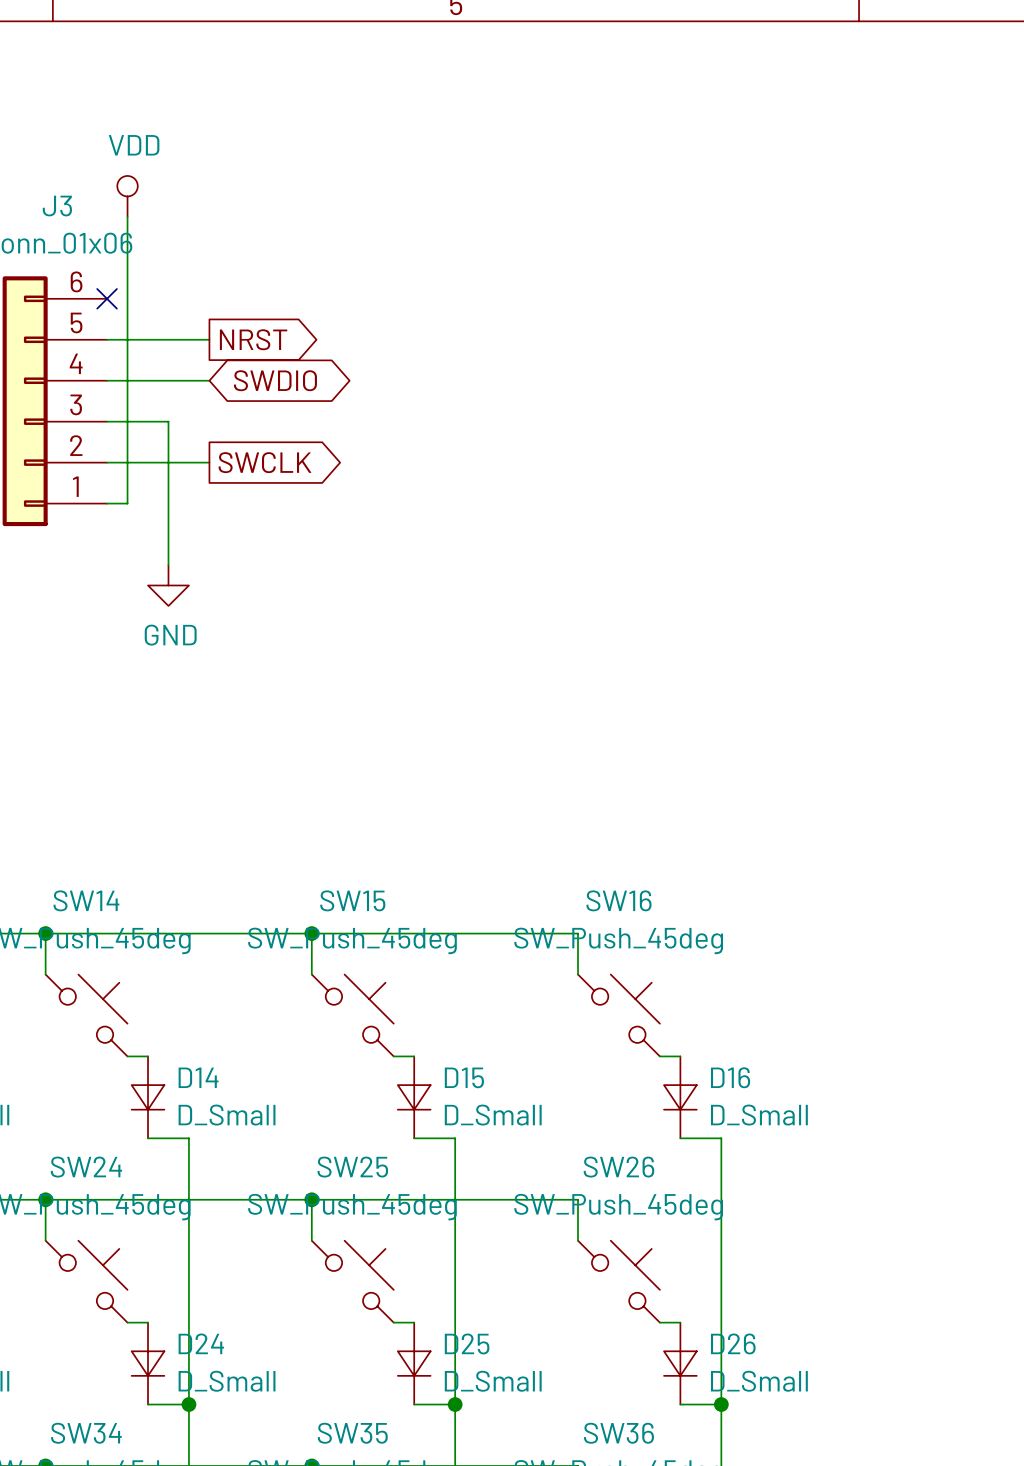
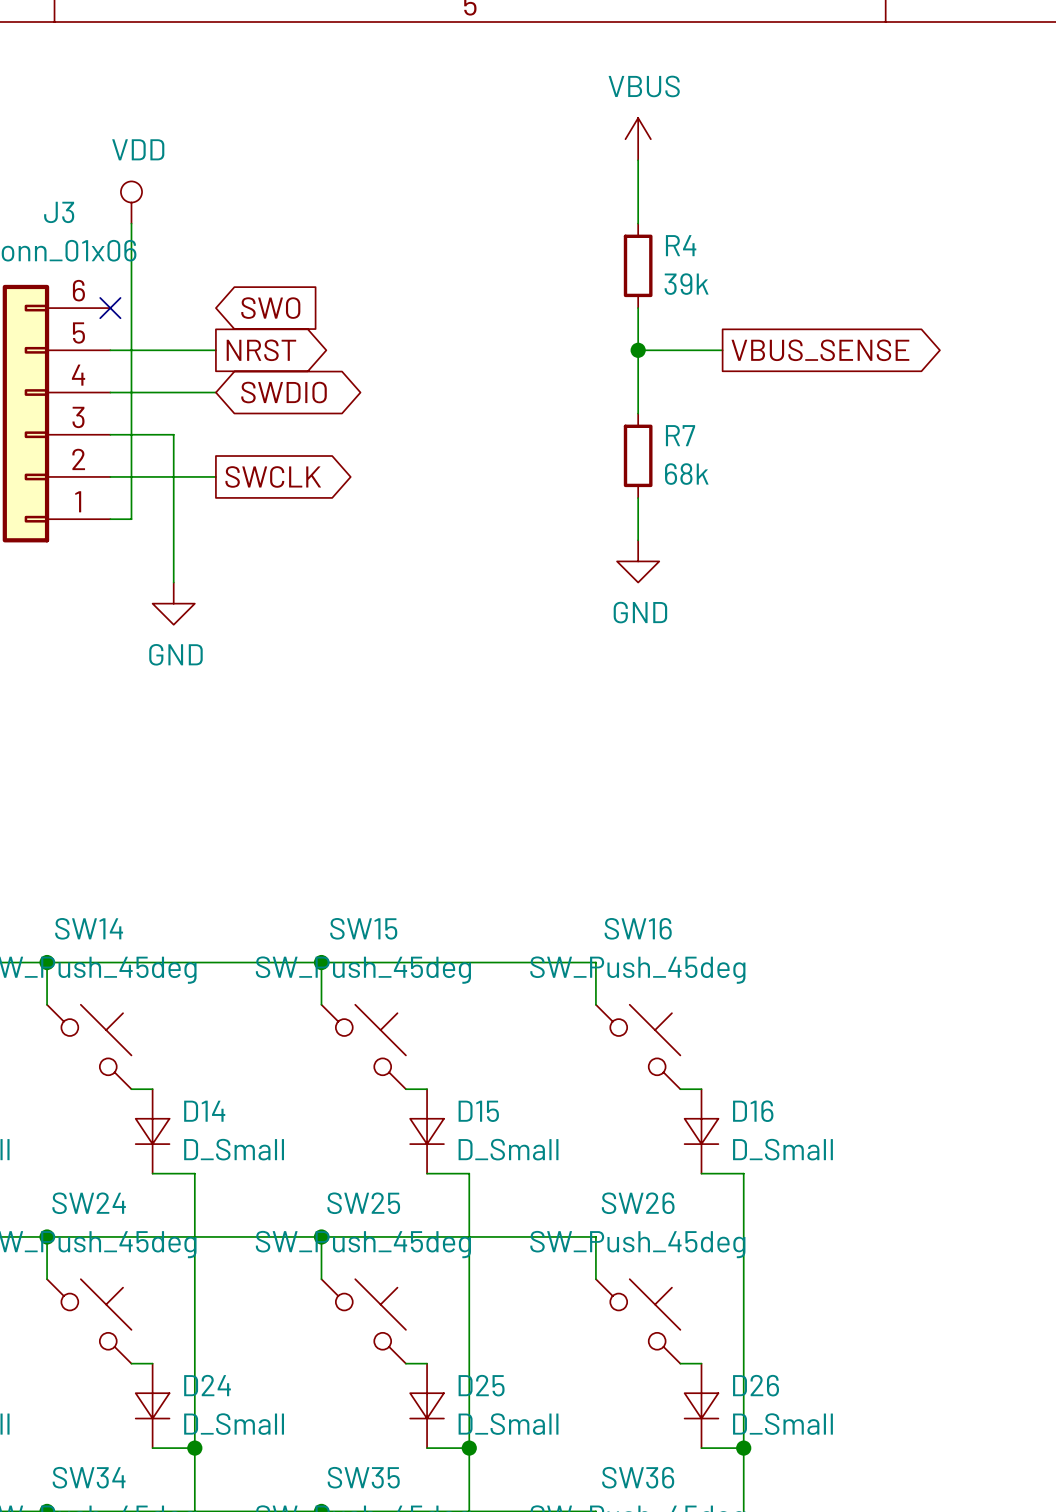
power symbol: none -> VBUS (638, 139)
wire: none -> (638, 160) (638, 223)
R4: none -> 39k (638, 265)
global label: none -> SWO (270, 308)
wire: none -> (638, 308) (638, 413)
wire: none -> (638, 350) (722, 350)
junction: none -> (638, 350)
global label: none -> VBUS_SENSE (820, 350)
R7: none -> 68k (638, 455)
wire: none -> (638, 498) (638, 540)
power symbol: none -> GND (638, 561)

